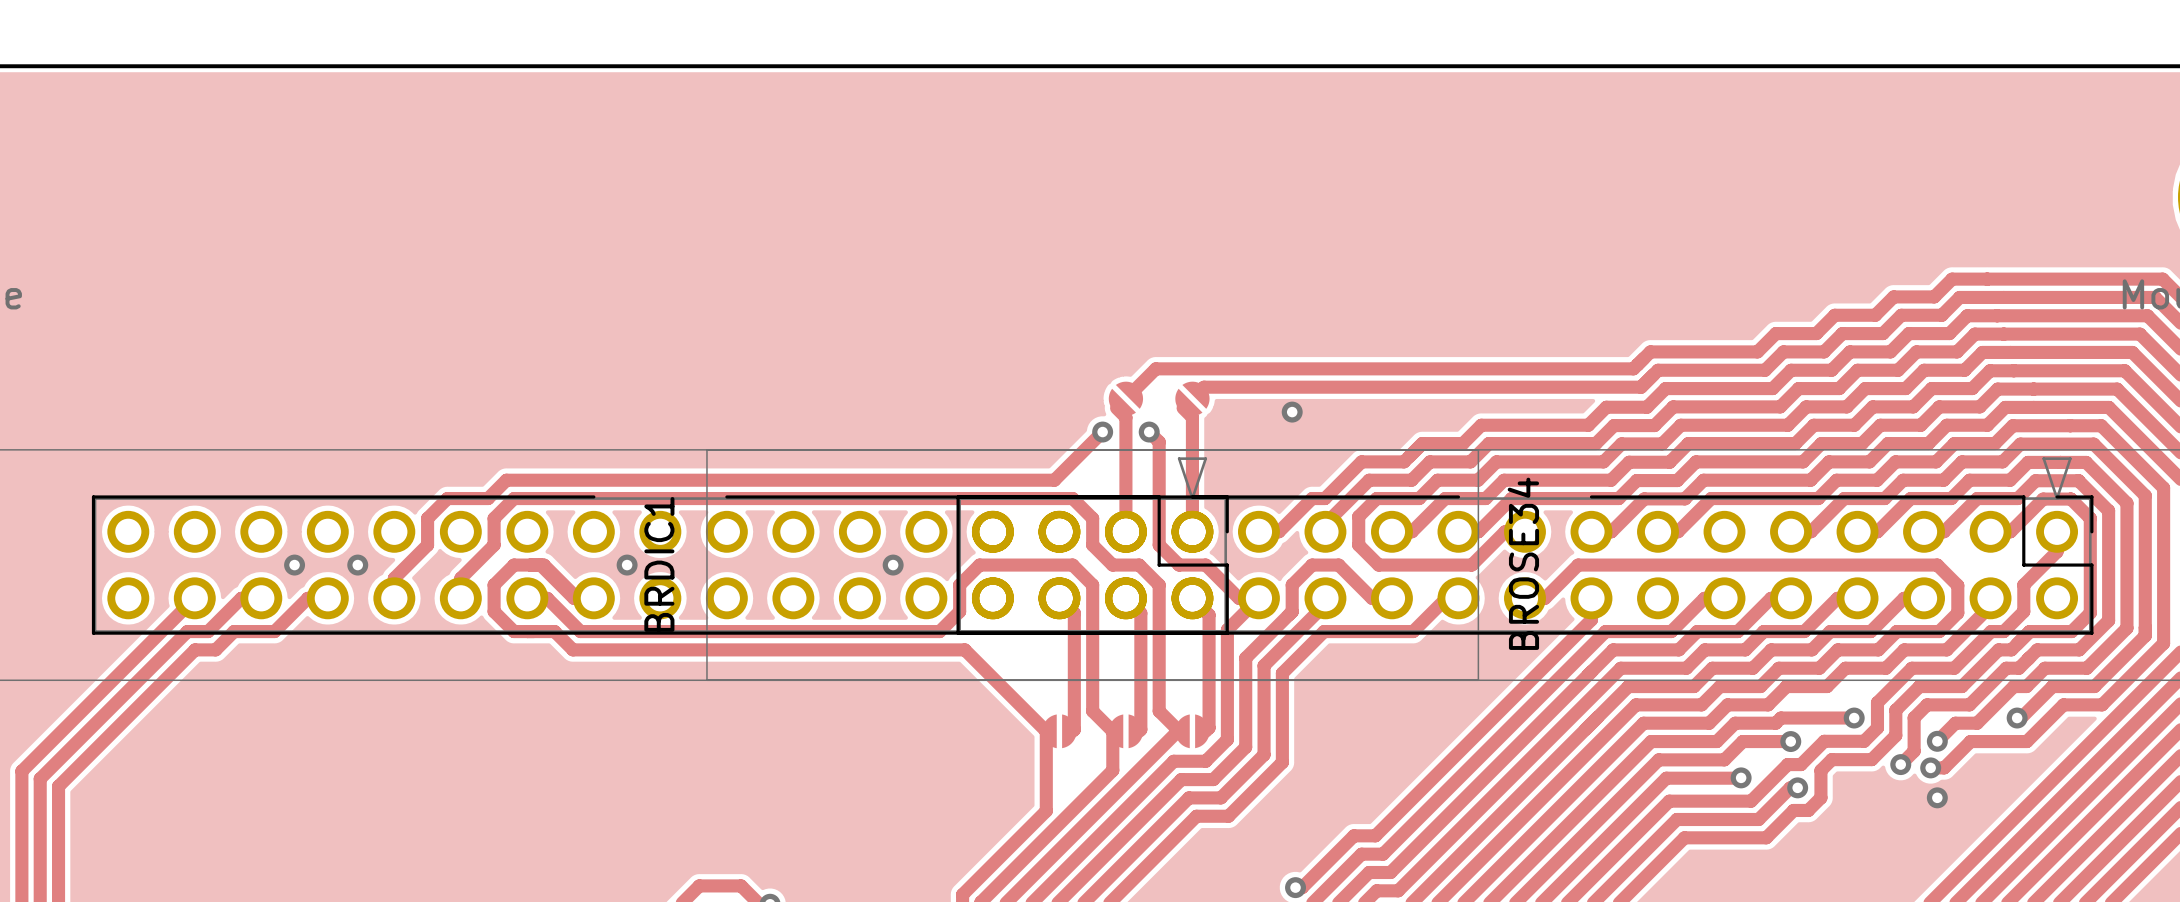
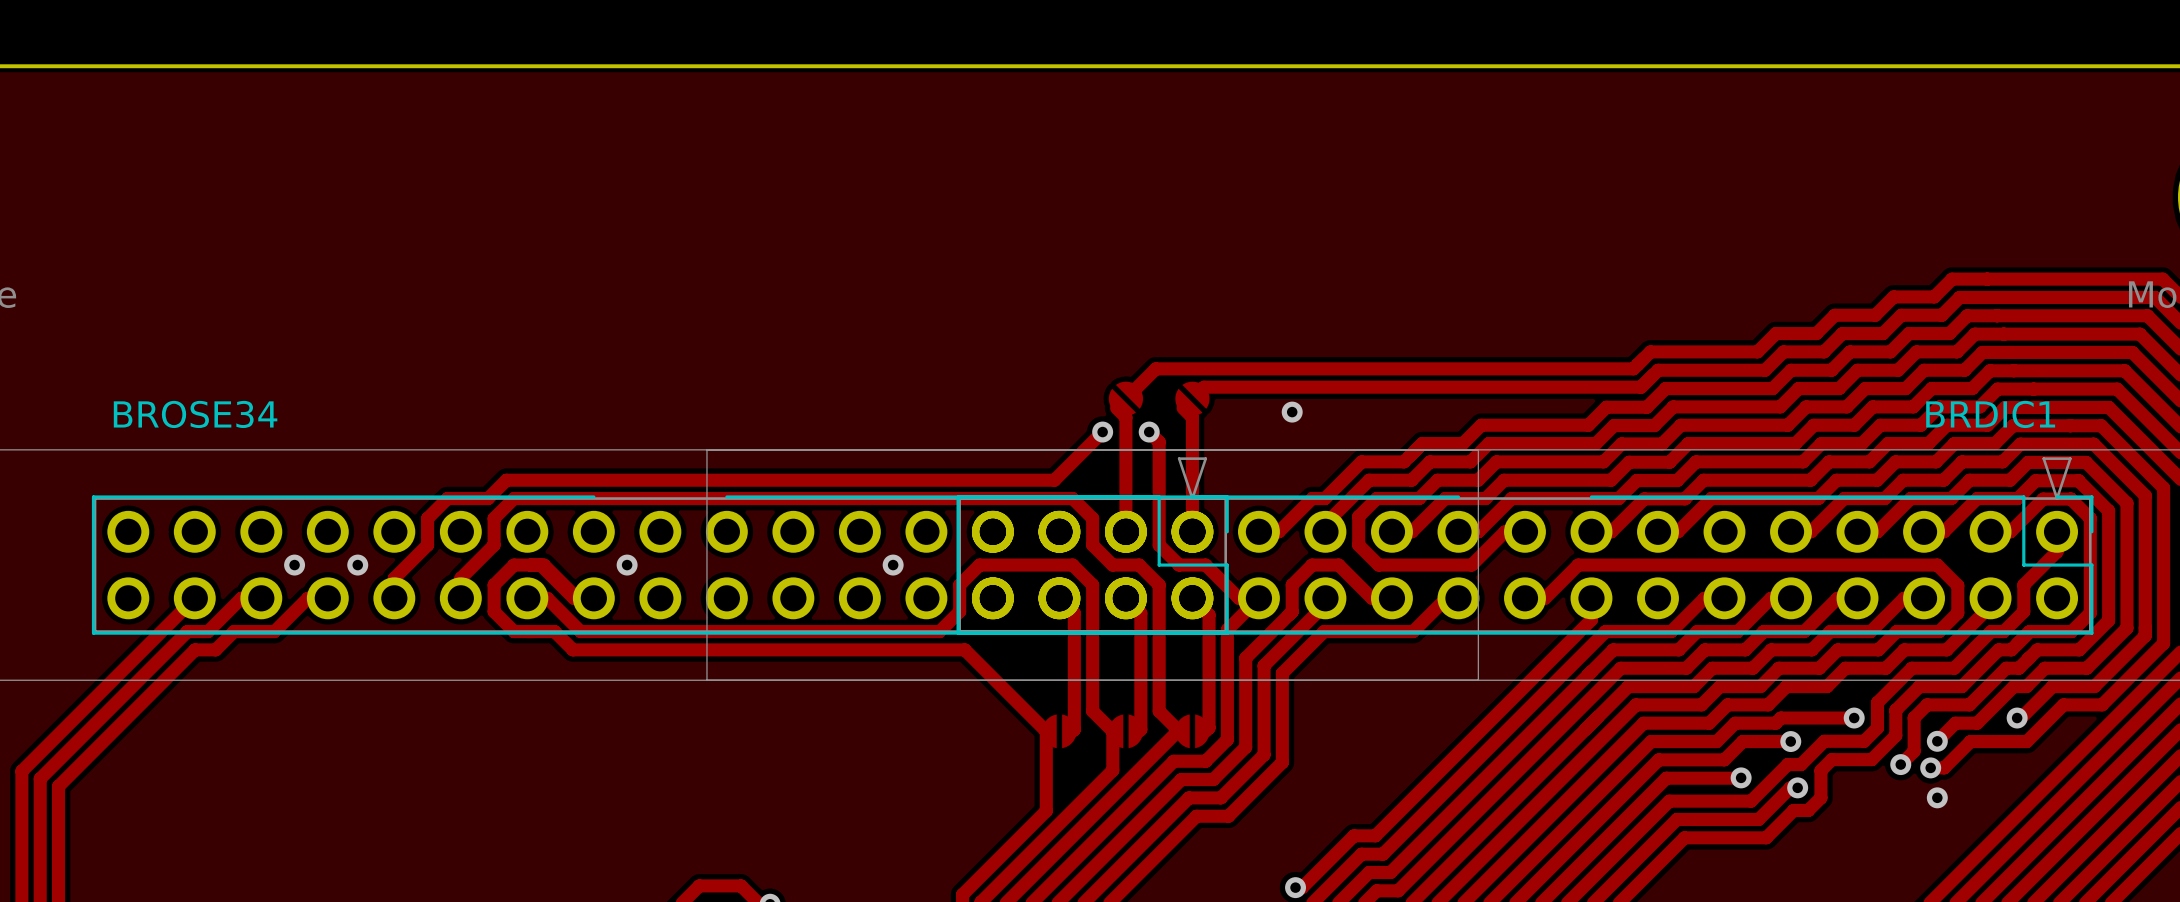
BROSE34 name rotation: 0° (1523, 563) -> 90° clockwise (195, 414)
BROSE34 name position: BROSE34 (1523, 563) -> BROSE34 (195, 414)
BRDIC1 name rotation: 0° (659, 564) -> 90° clockwise (1990, 414)
BRDIC1 name position: BRDIC1 (659, 564) -> BRDIC1 (1990, 414)

